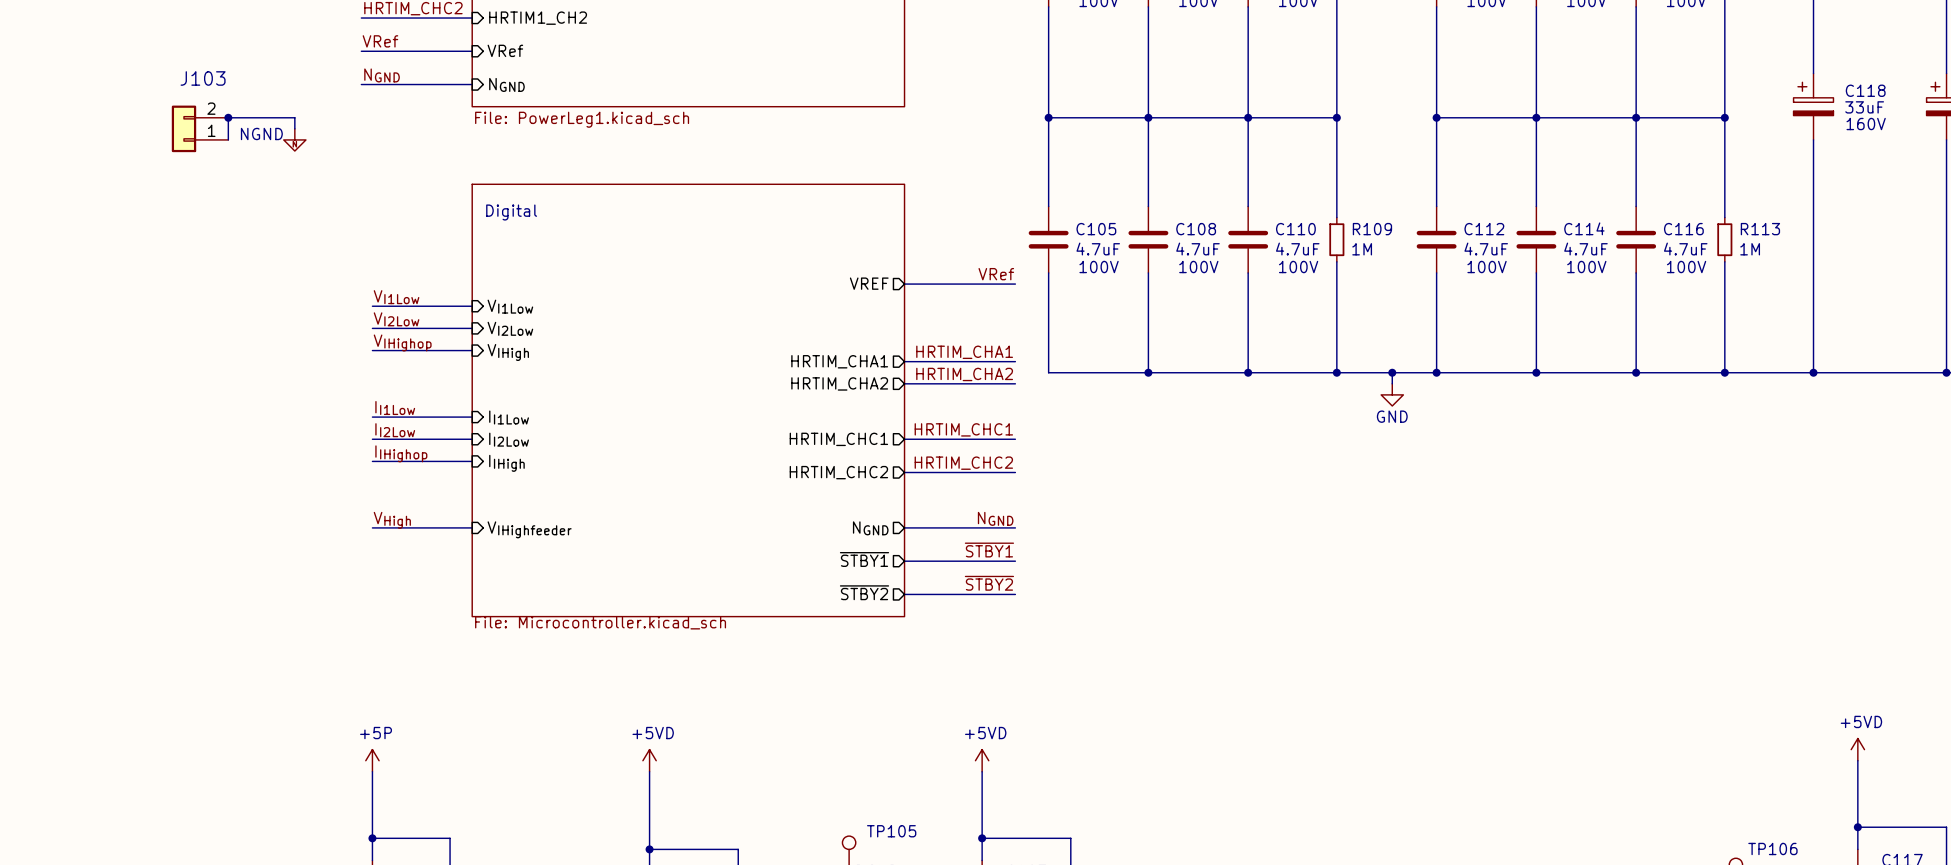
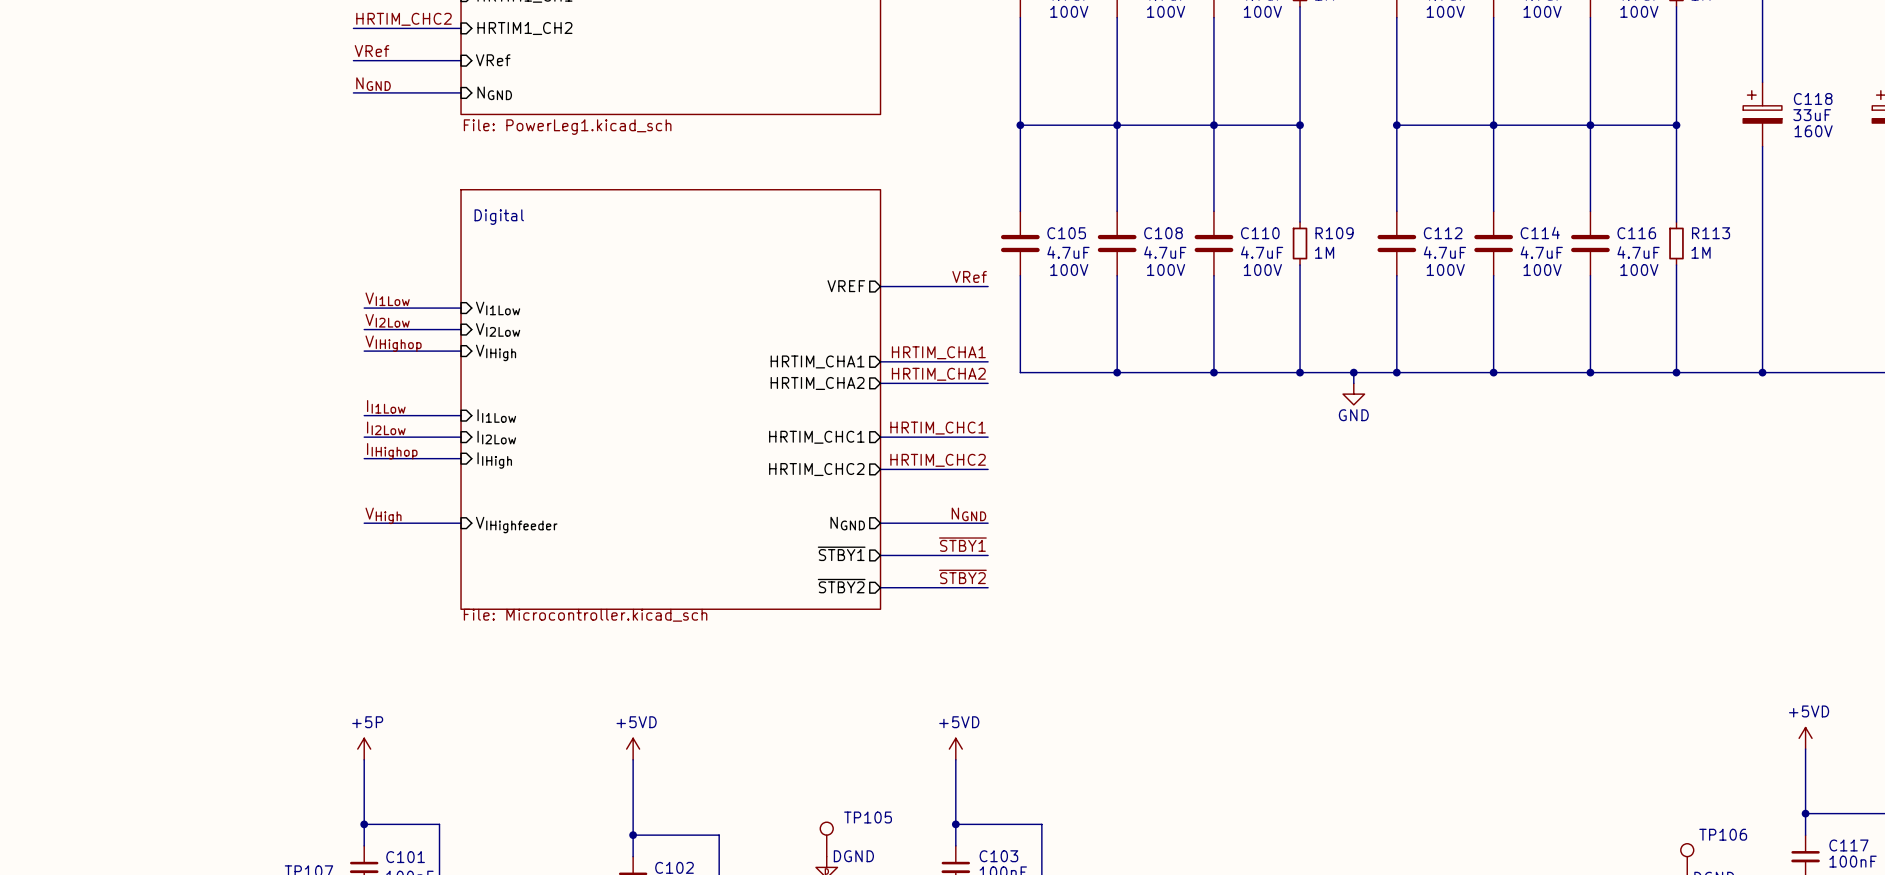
junction: (228, 117) -> none
J103: (200, 128) -> none
wire: (294, 128) (294, 117) (228, 117) (228, 139) -> none
power symbol: NGND (294, 139) -> none

